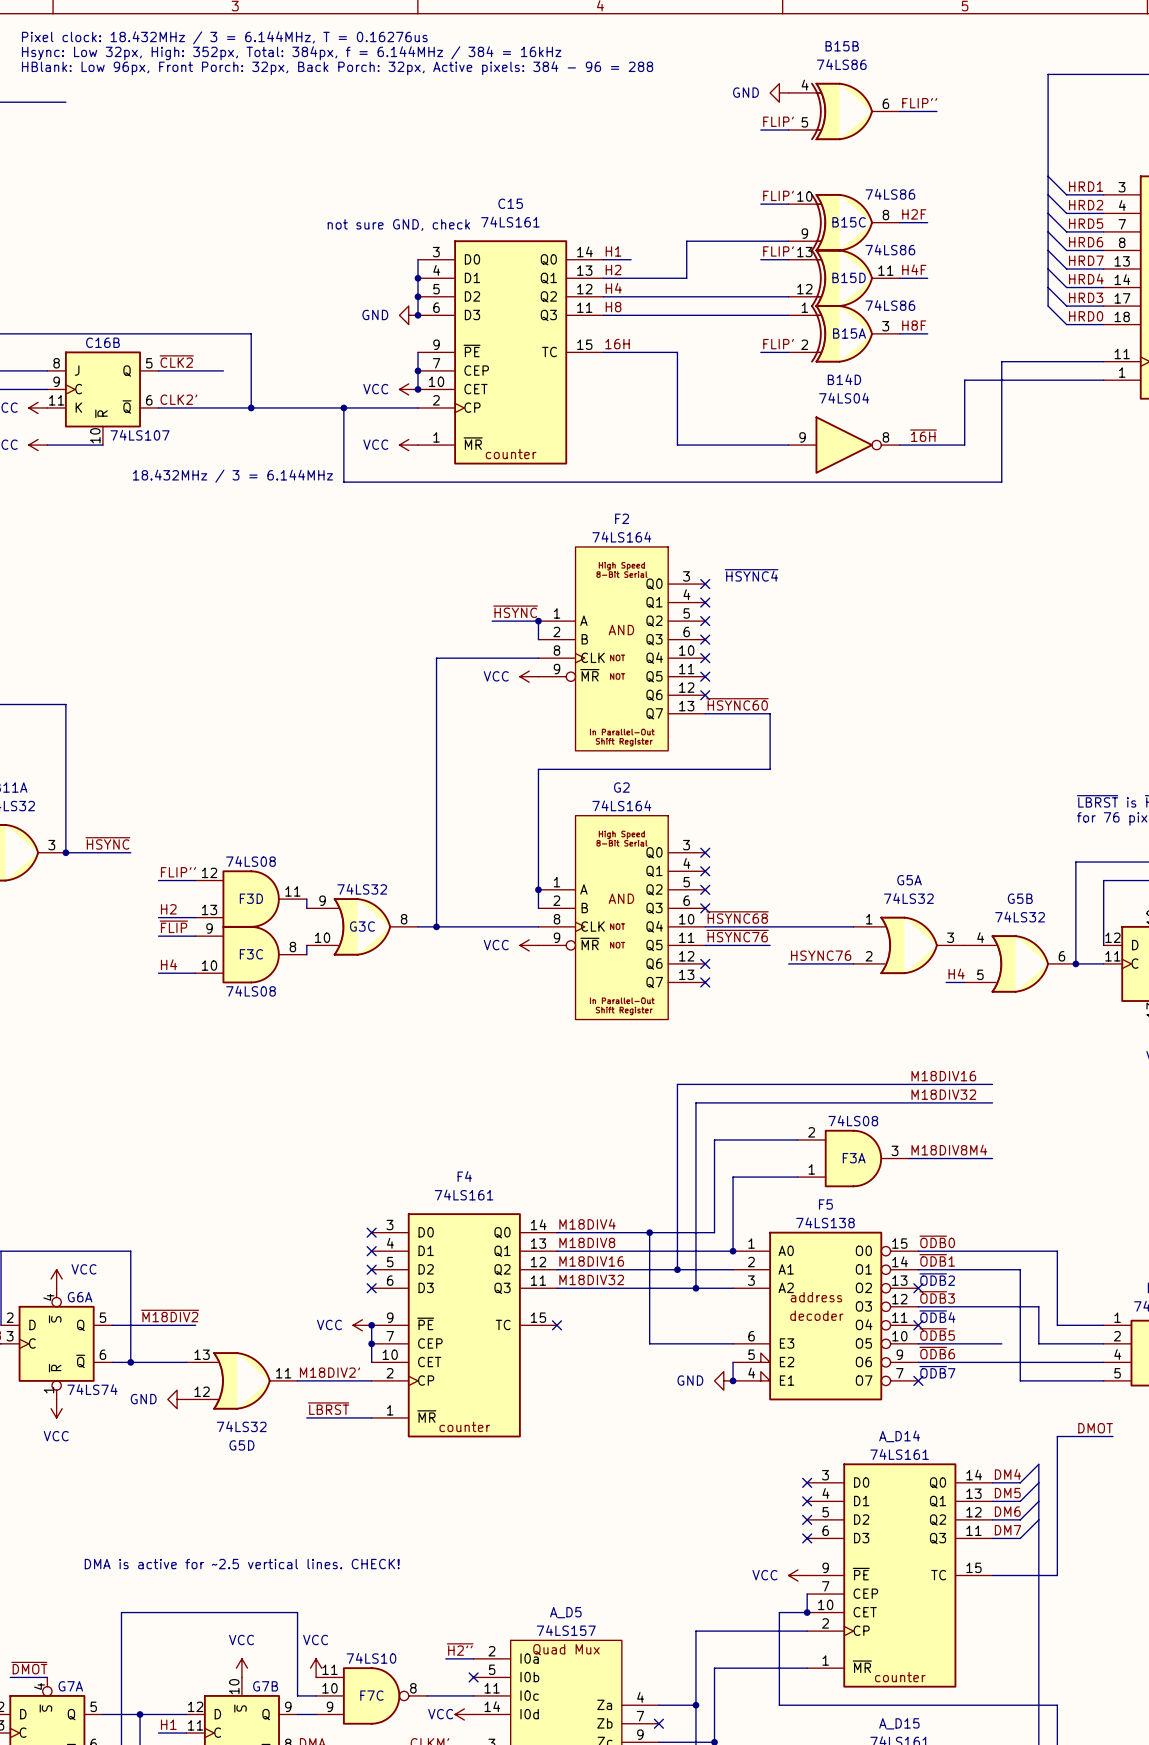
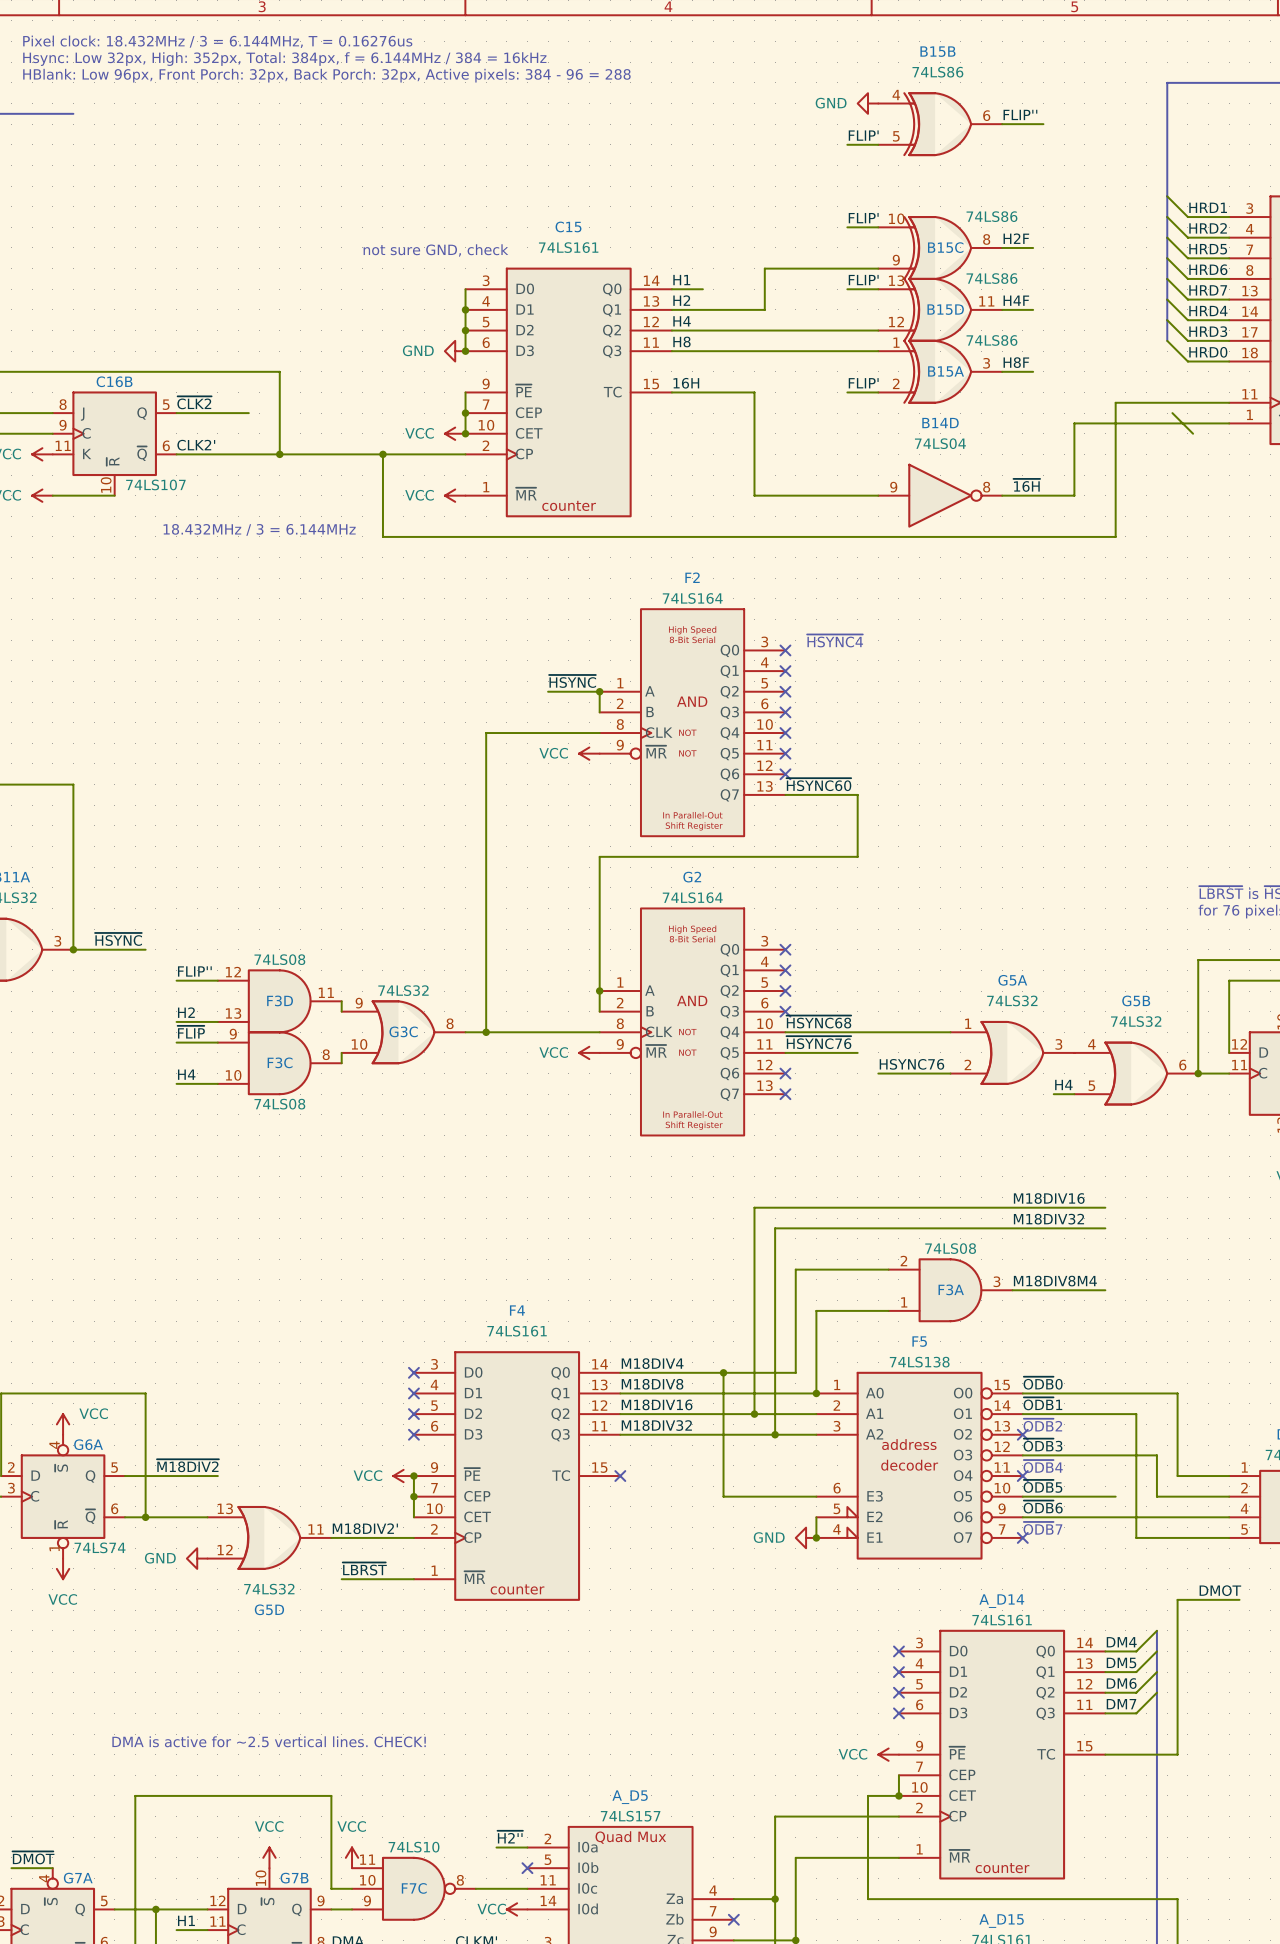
wire: none -> (1172, 413) (1193, 433)

